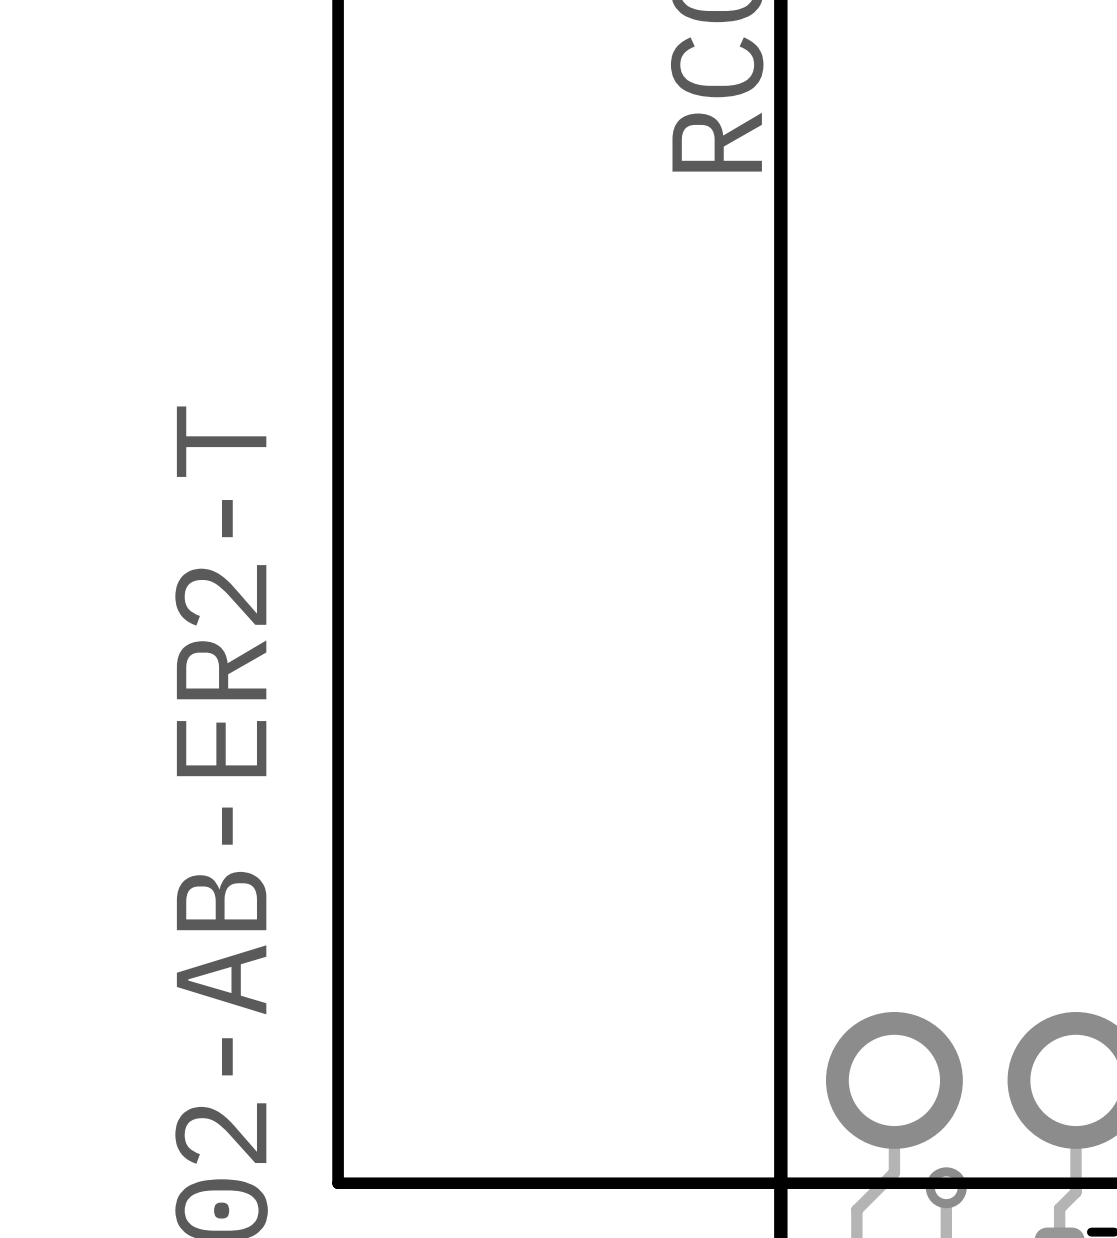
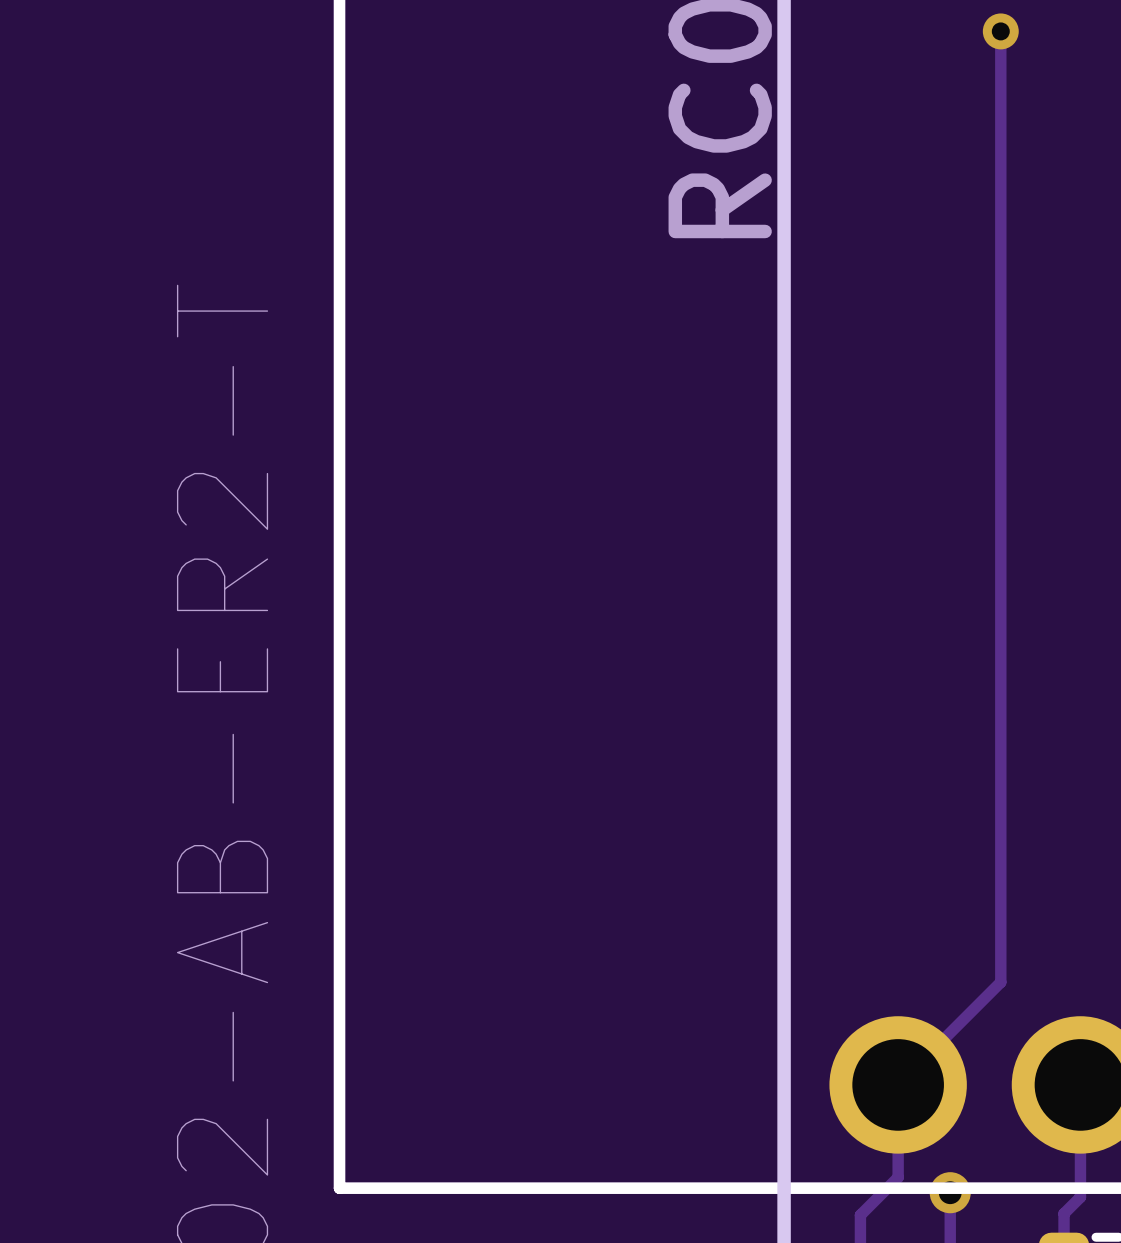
track: none -> (1000, 31) (1000, 982) (898, 1084)
via: none -> (1000, 31)

